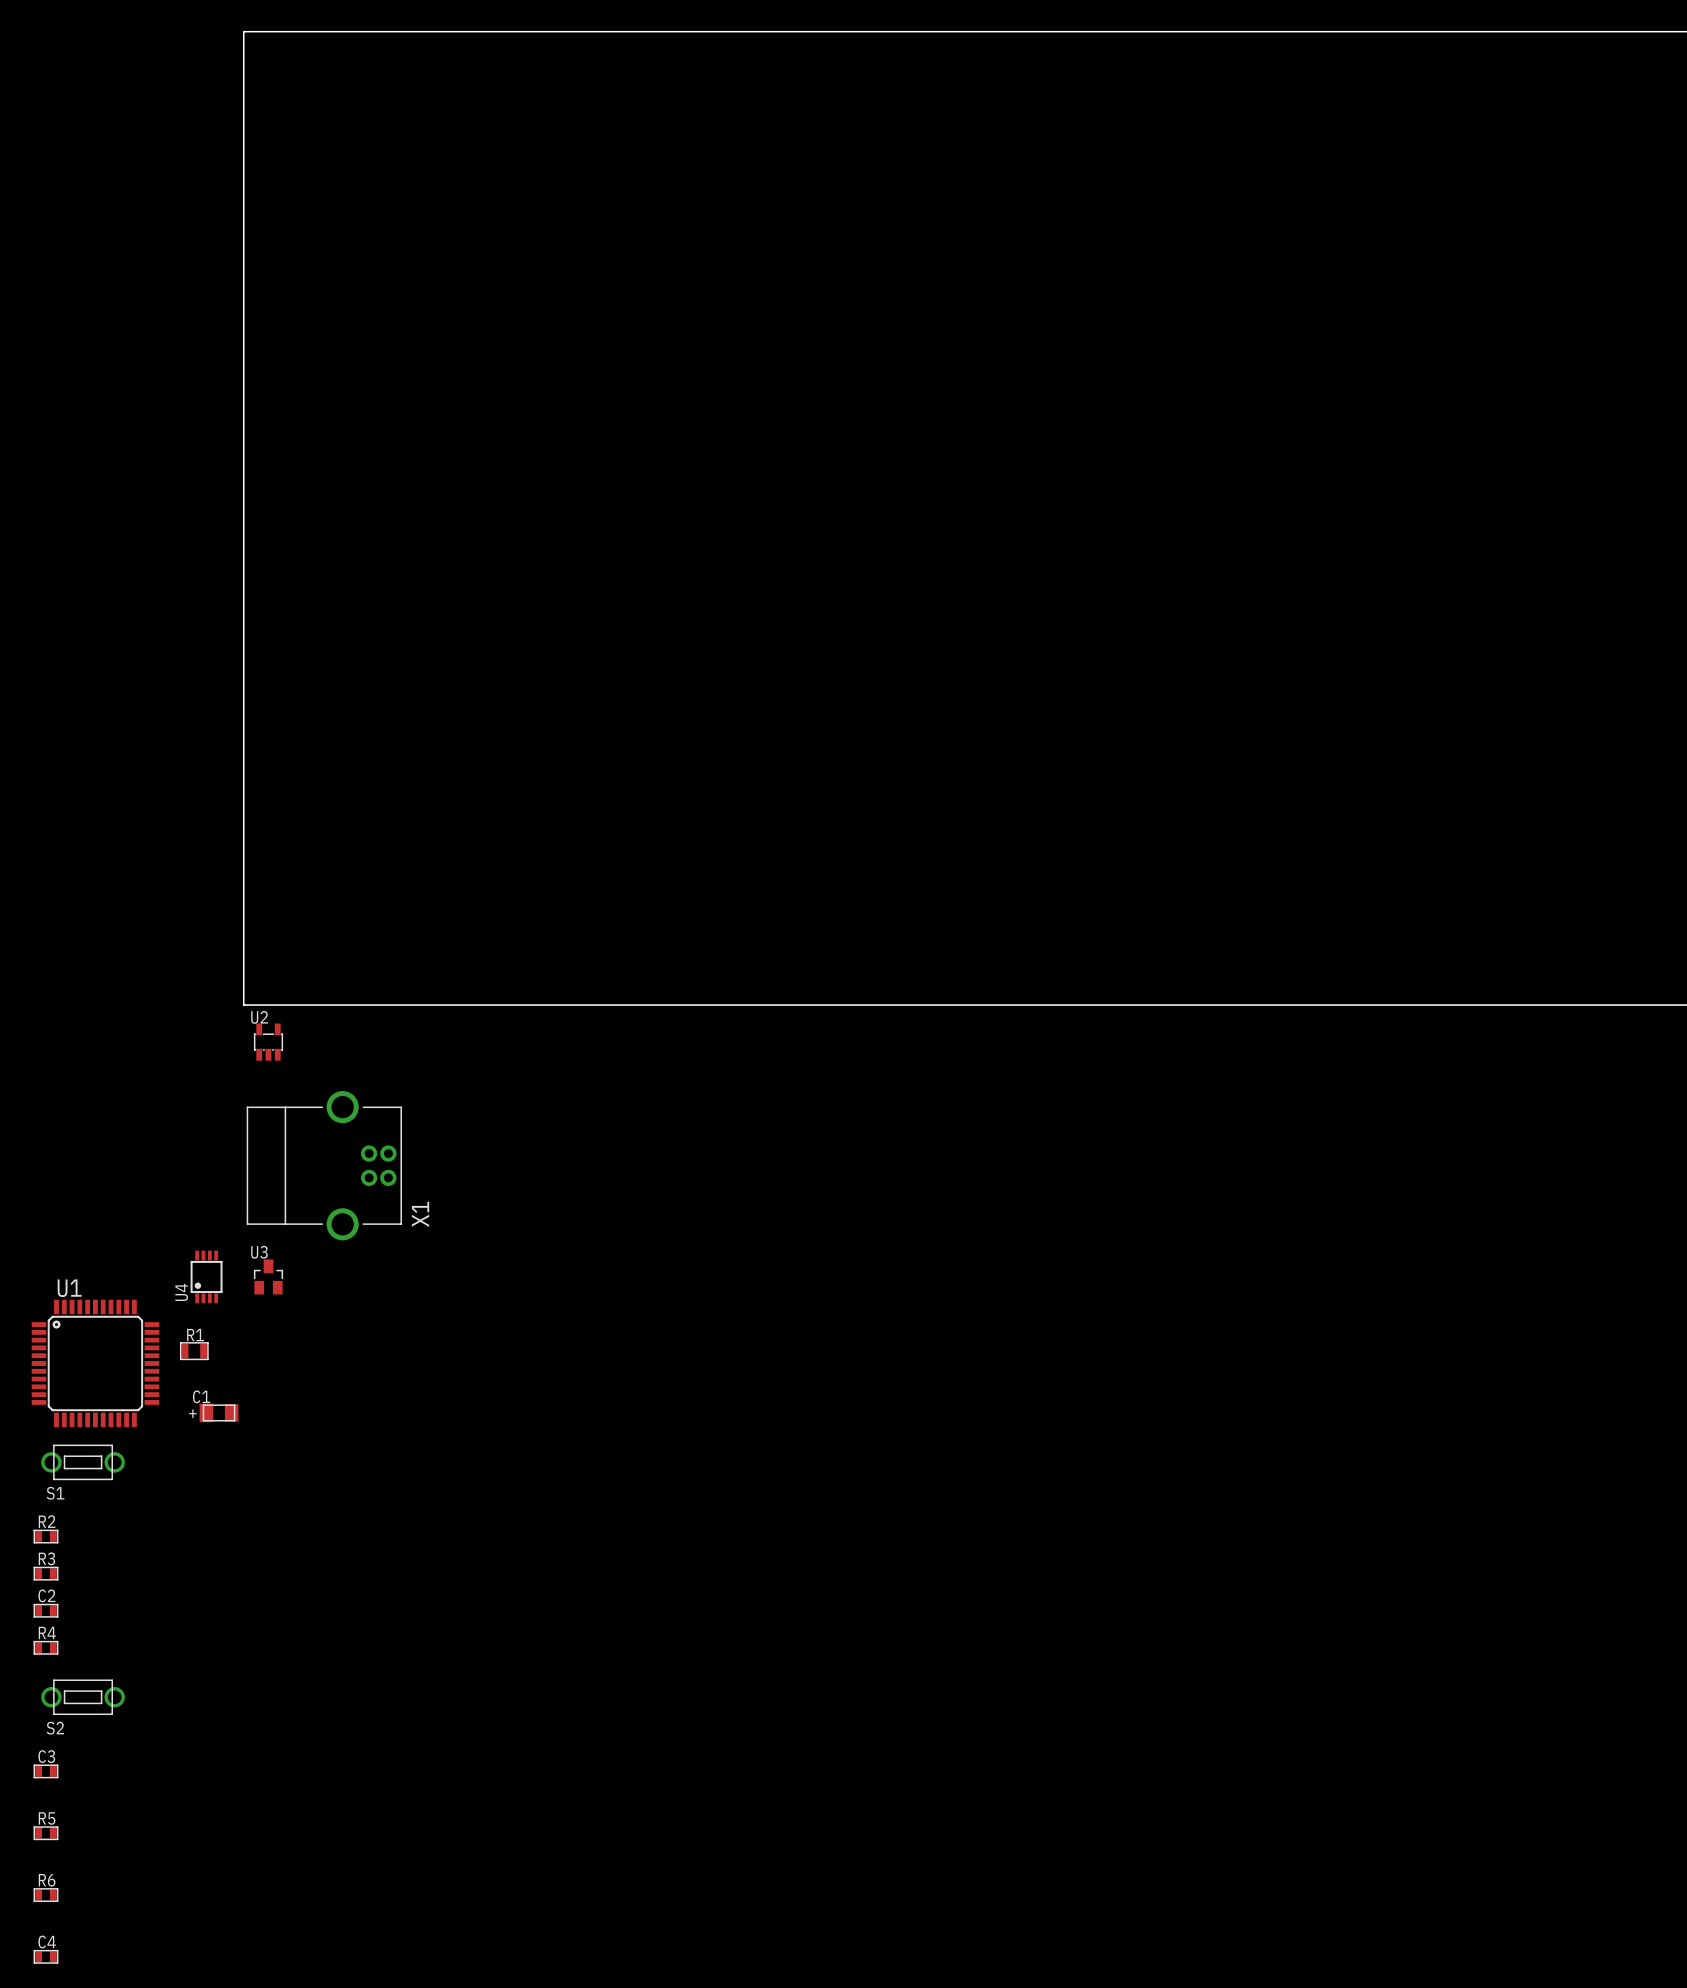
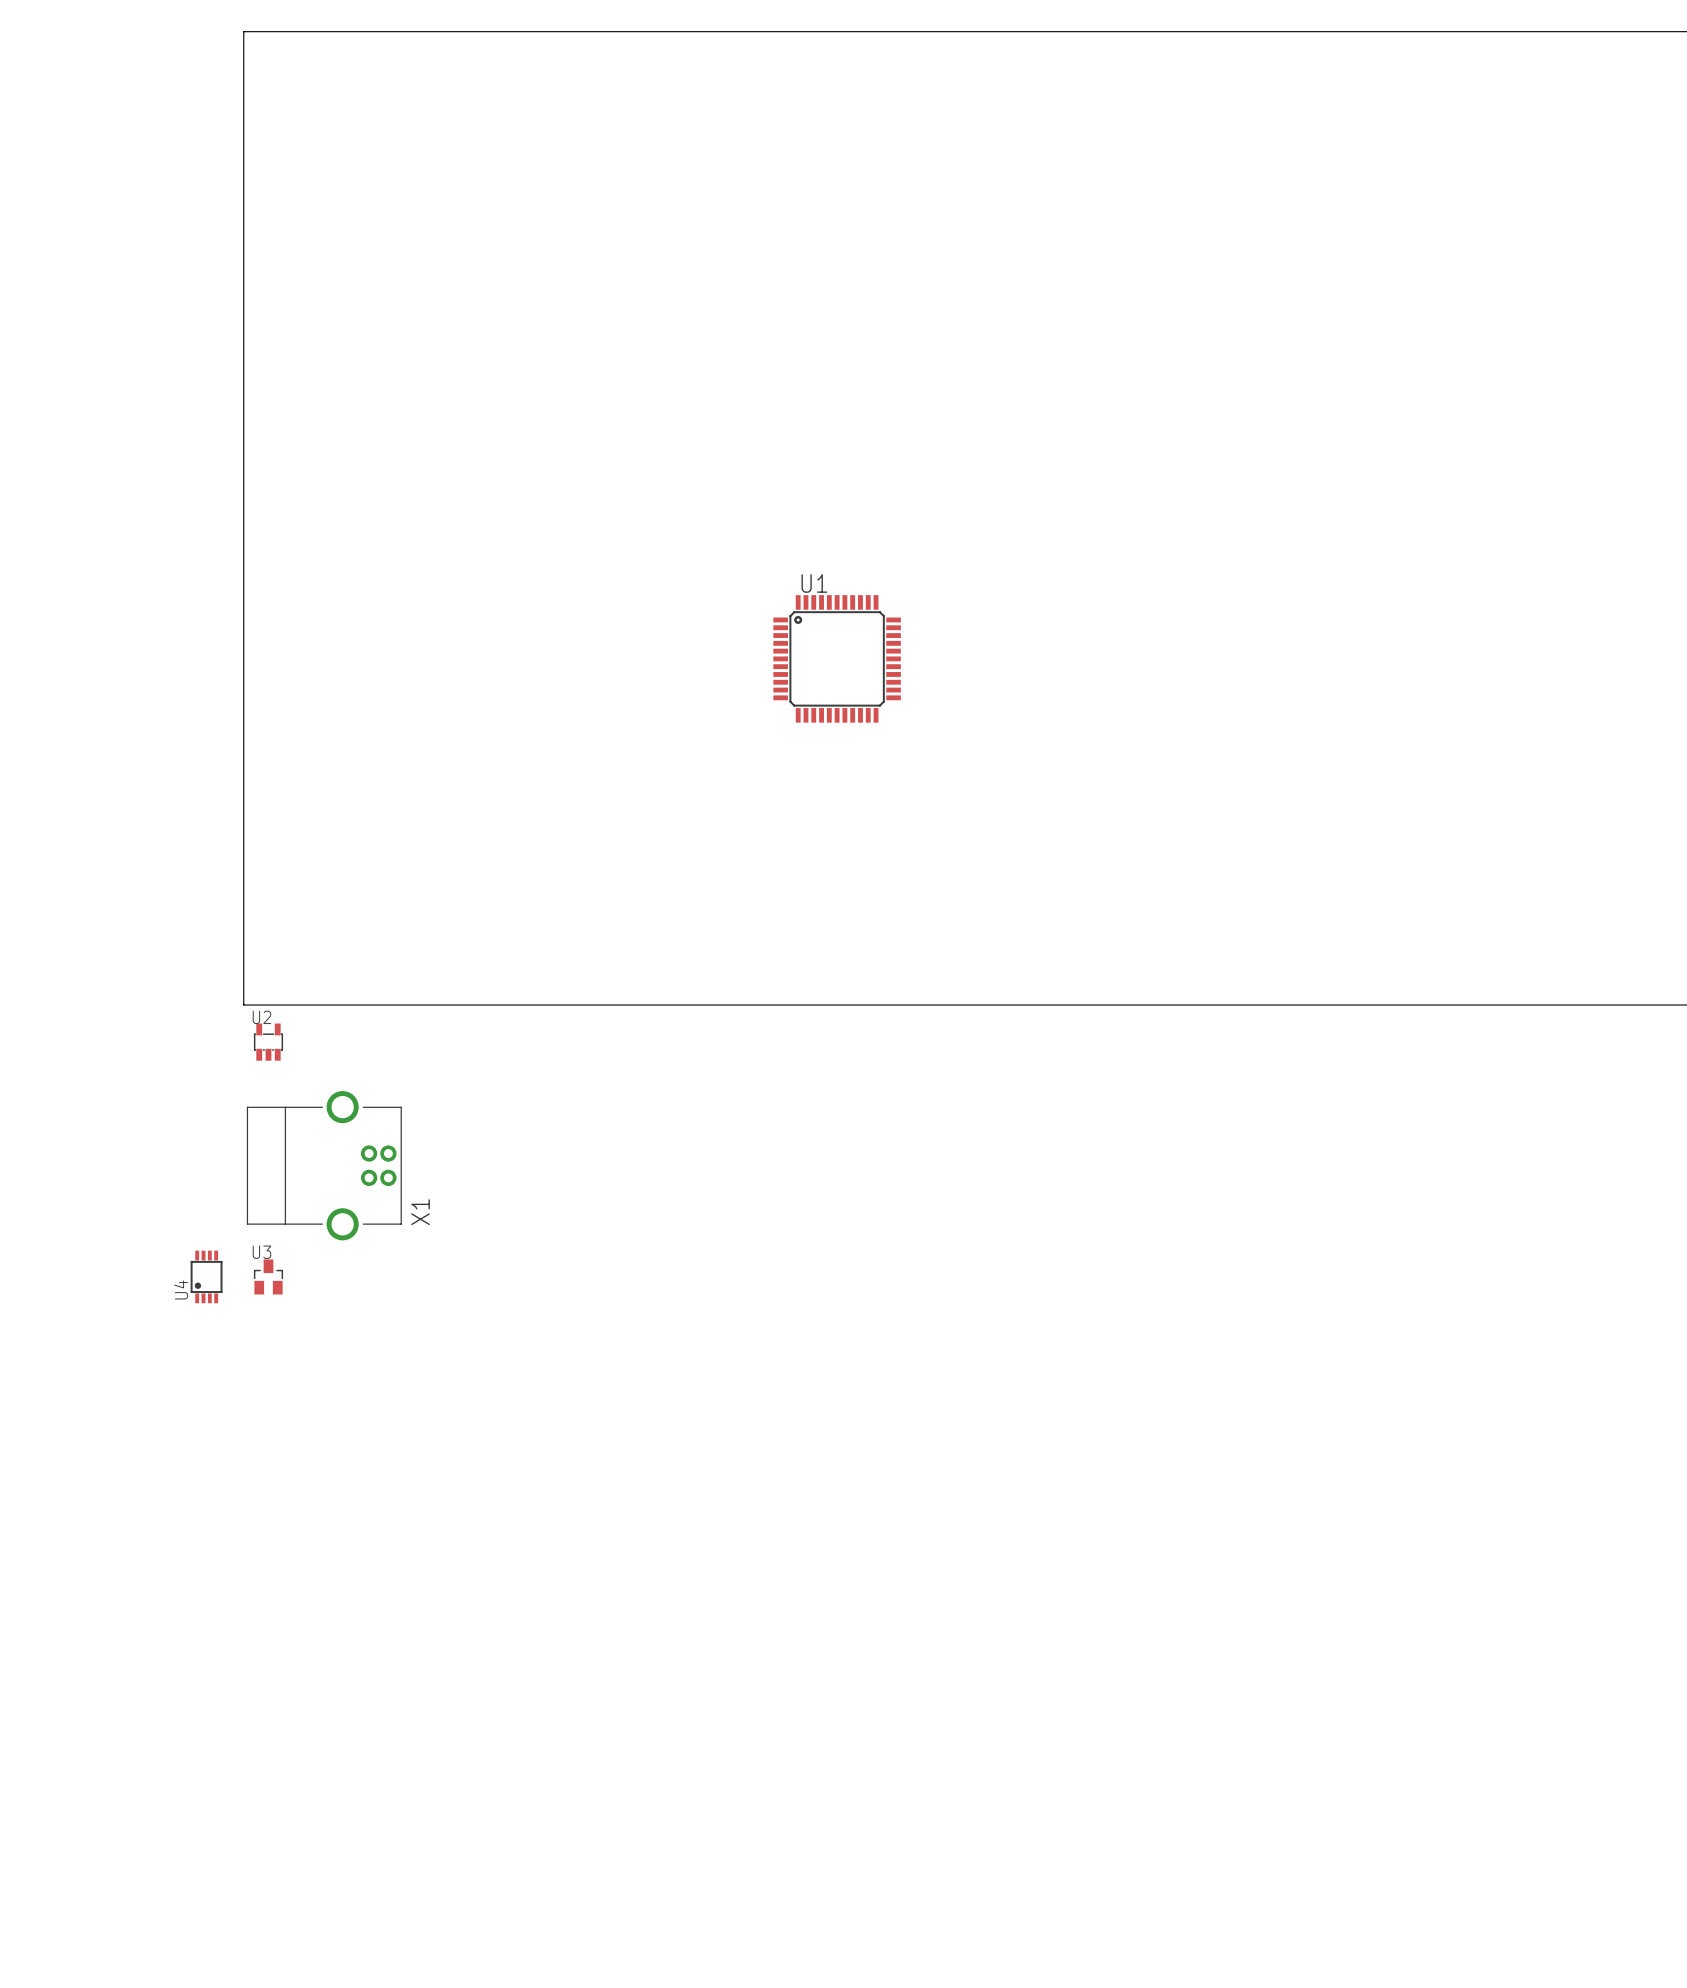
R1: (194, 1351) -> none
U1 position: (95, 1363) -> (837, 658)
C1: (219, 1412) -> none
S1: (83, 1462) -> none
R2: (45, 1536) -> none
R3: (45, 1573) -> none
C2: (45, 1610) -> none
R4: (45, 1647) -> none
S2: (83, 1697) -> none
C3: (45, 1771) -> none
R5: (45, 1833) -> none
R6: (45, 1895) -> none
C4: (45, 1956) -> none

